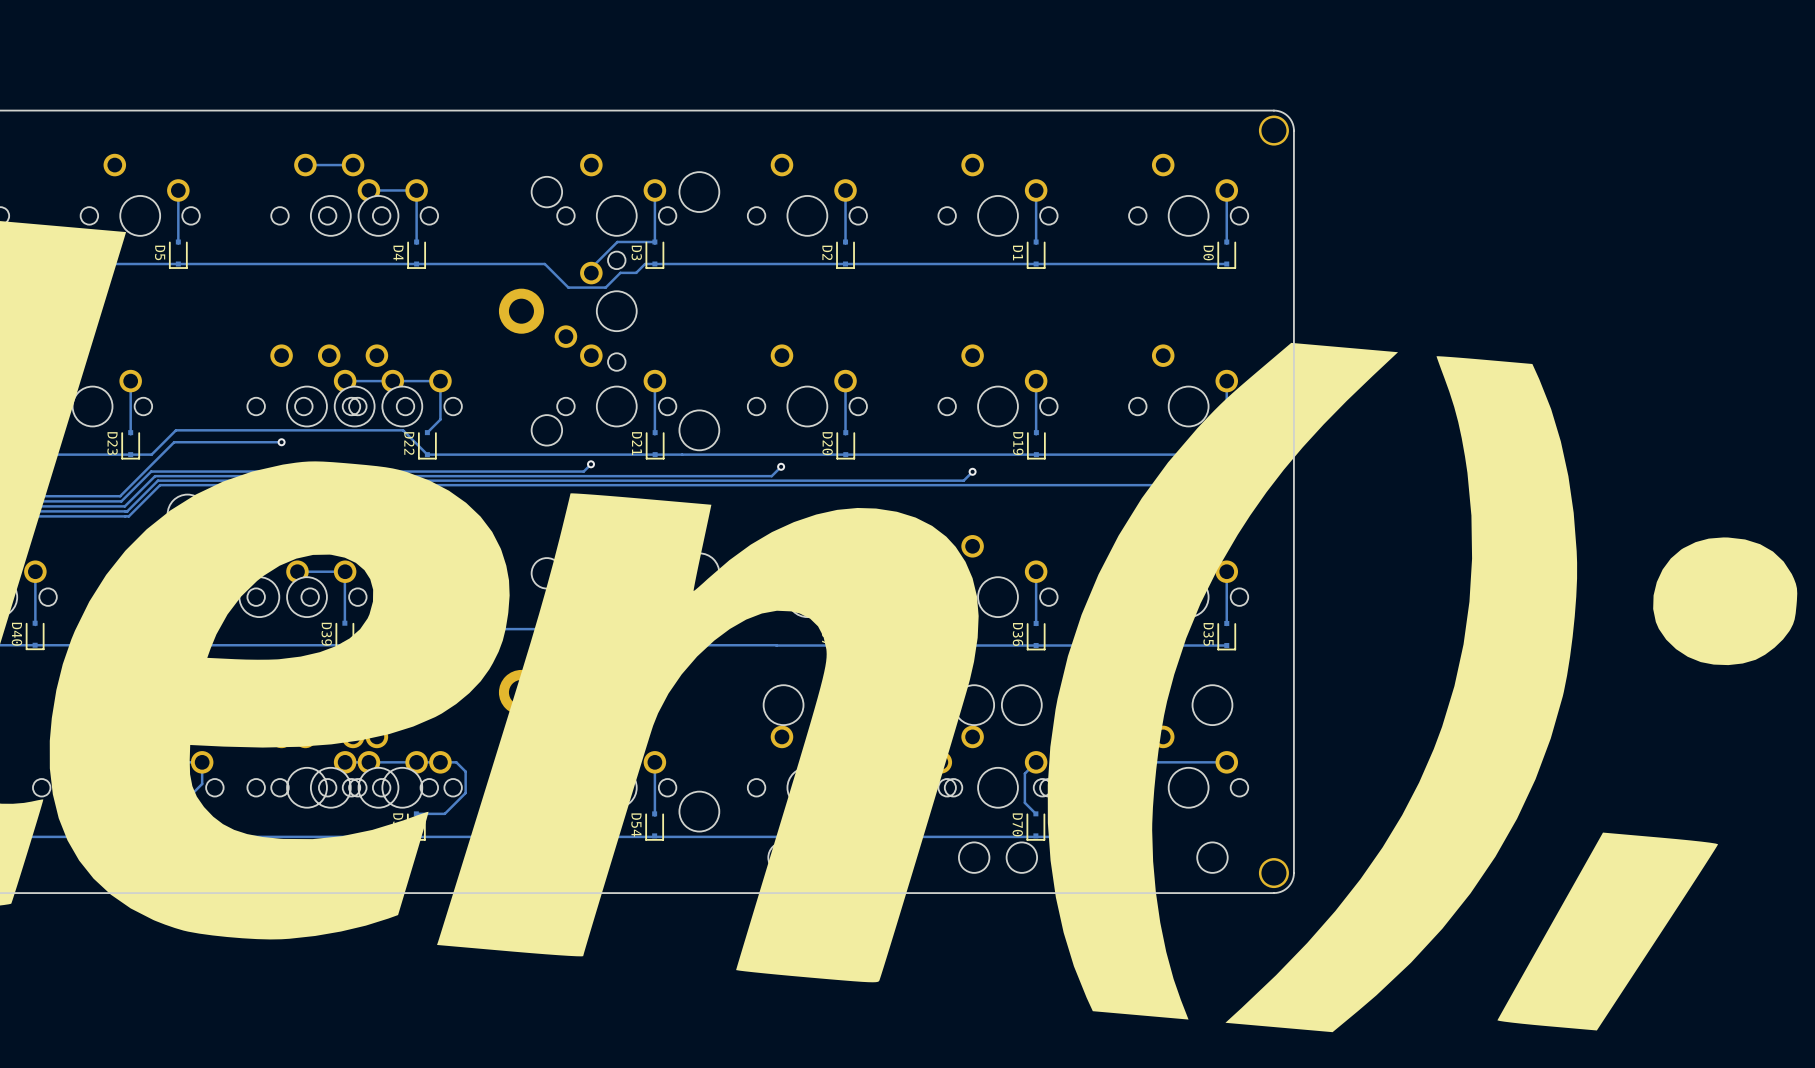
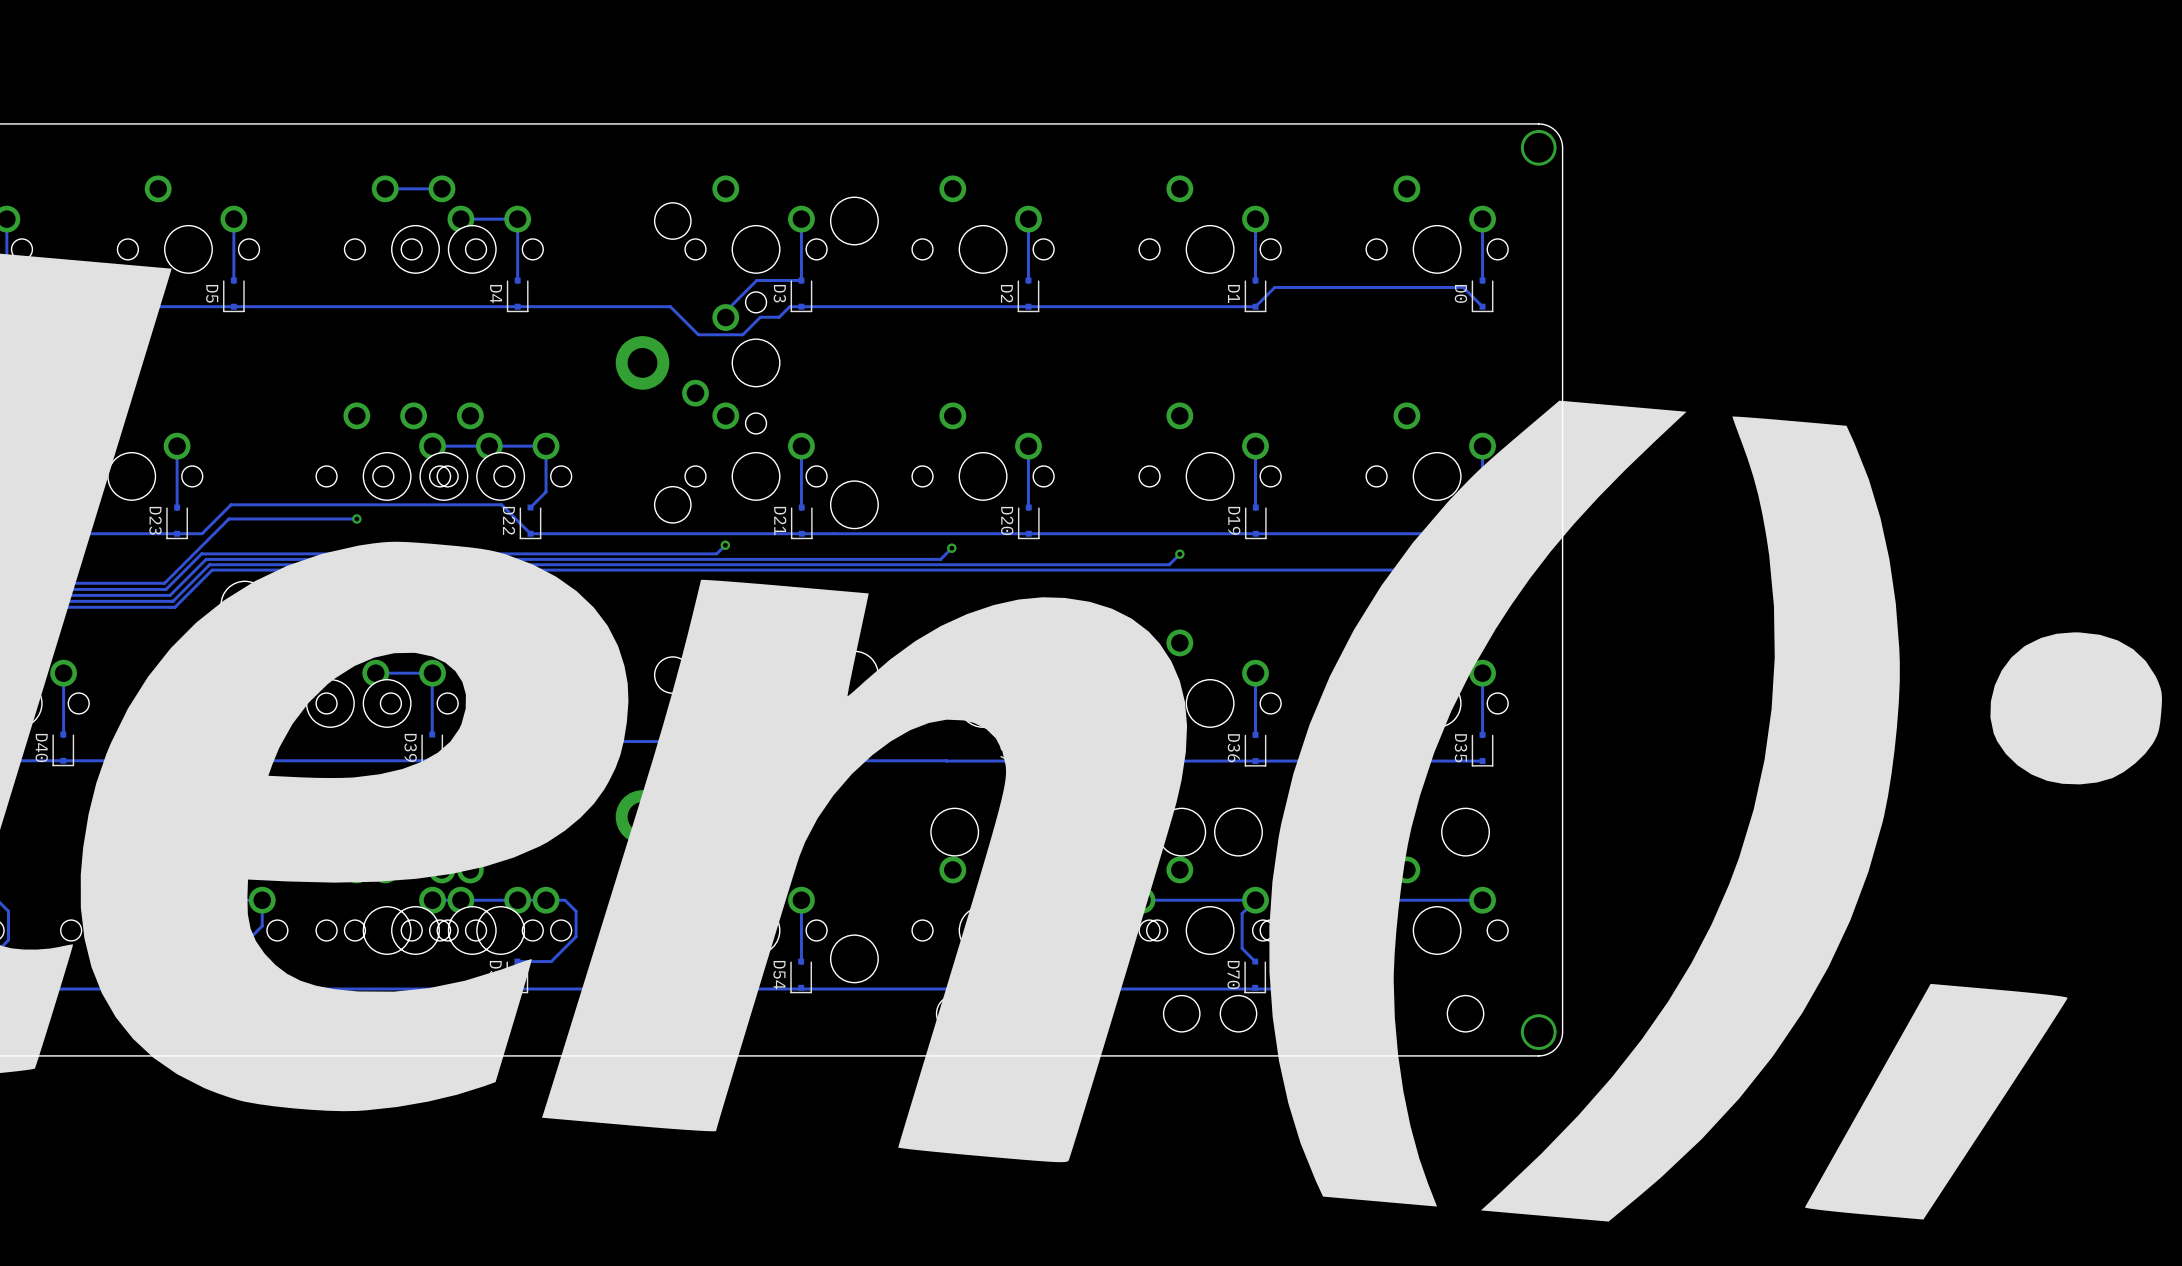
track: (1226, 264) (1036, 264) -> (1482, 306) (1463, 287) (1274, 287) (1255, 306)
track: none -> (1255, 900) (1113, 900)

